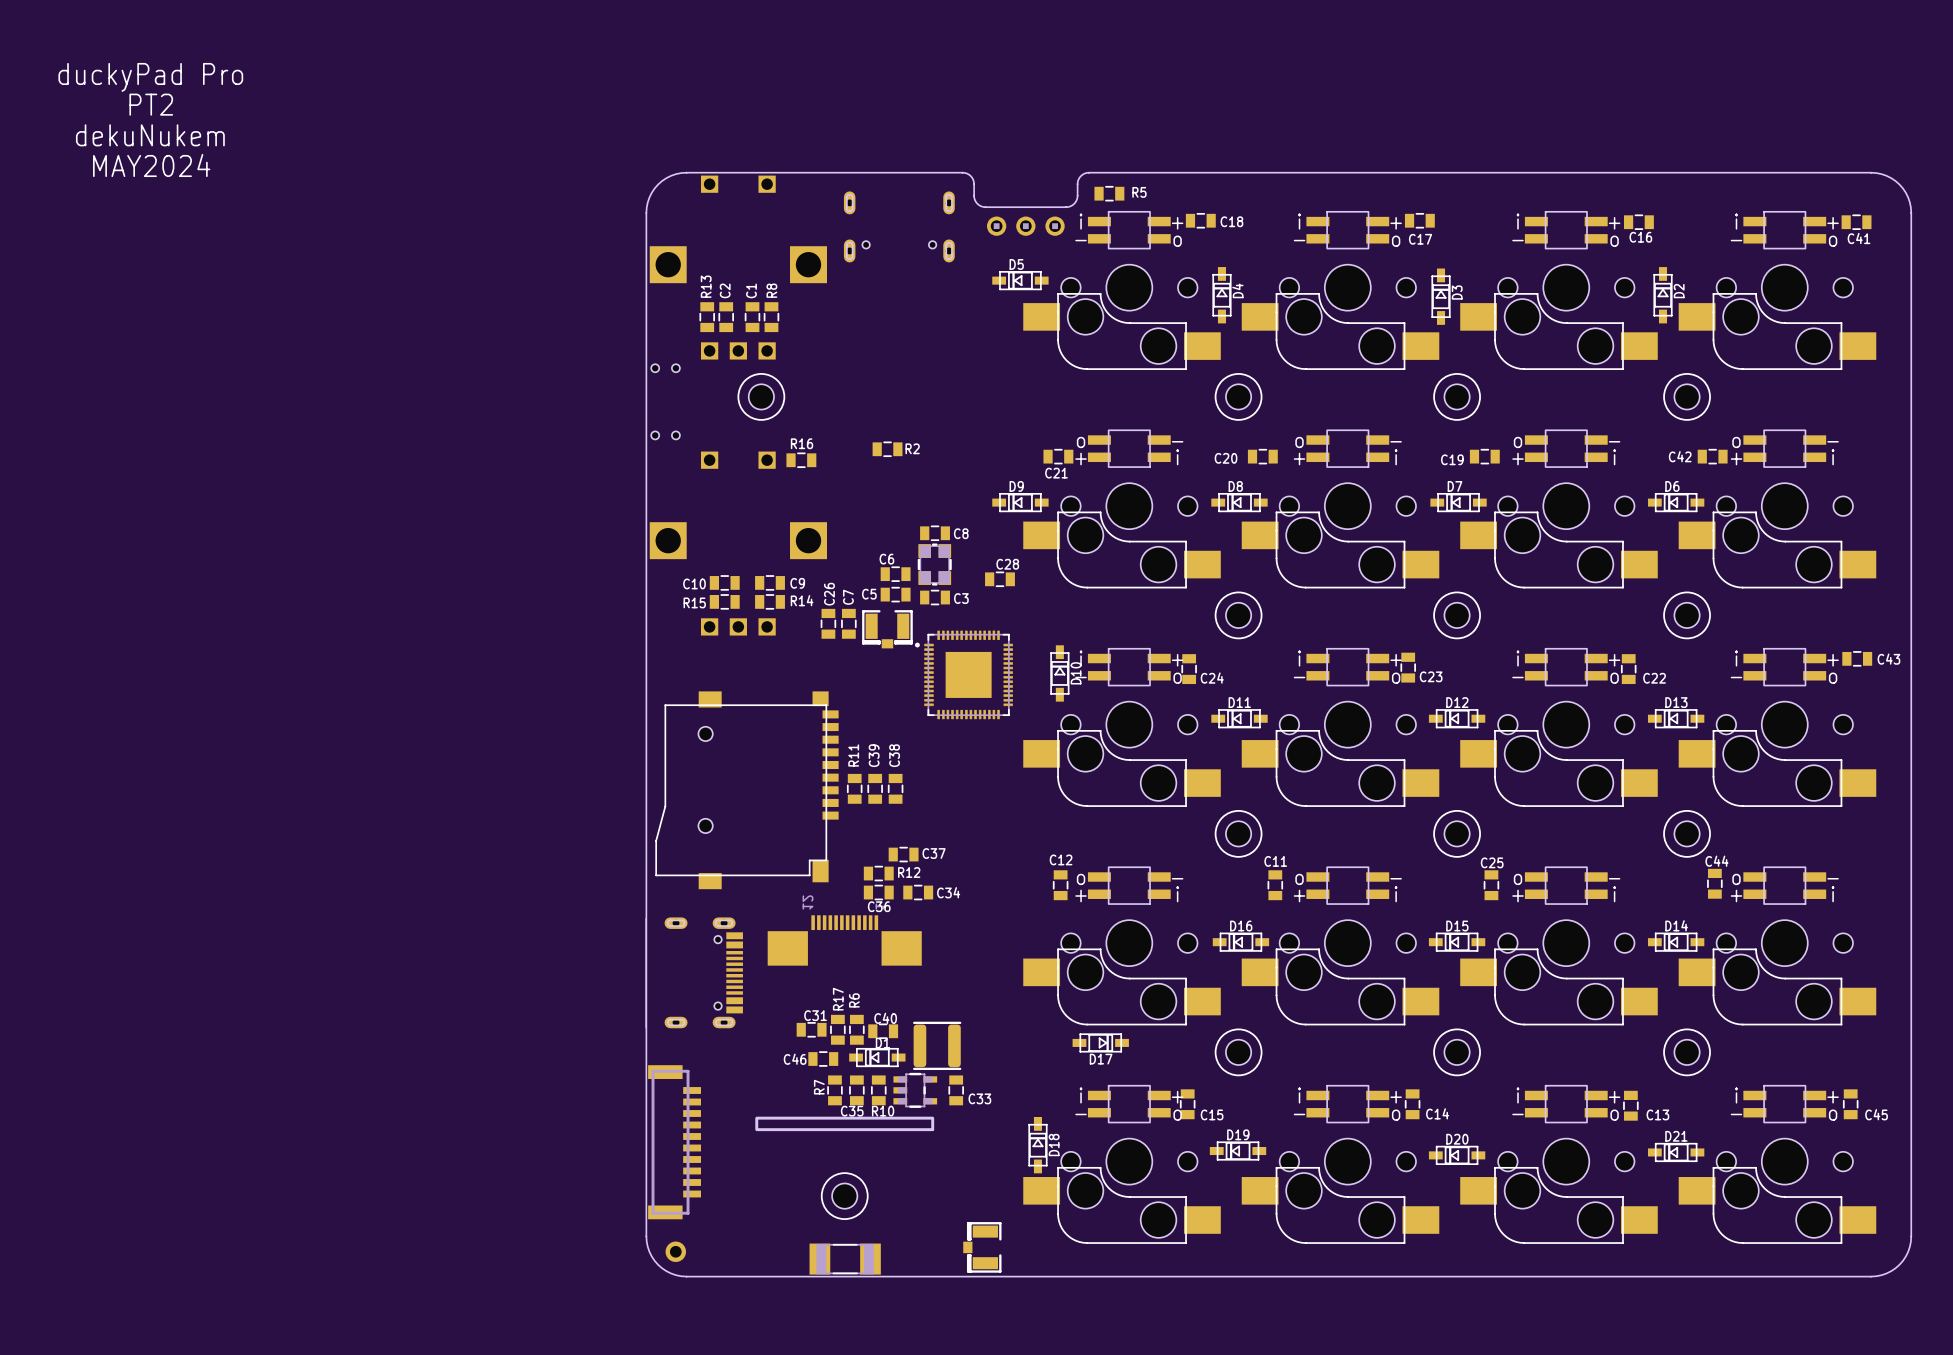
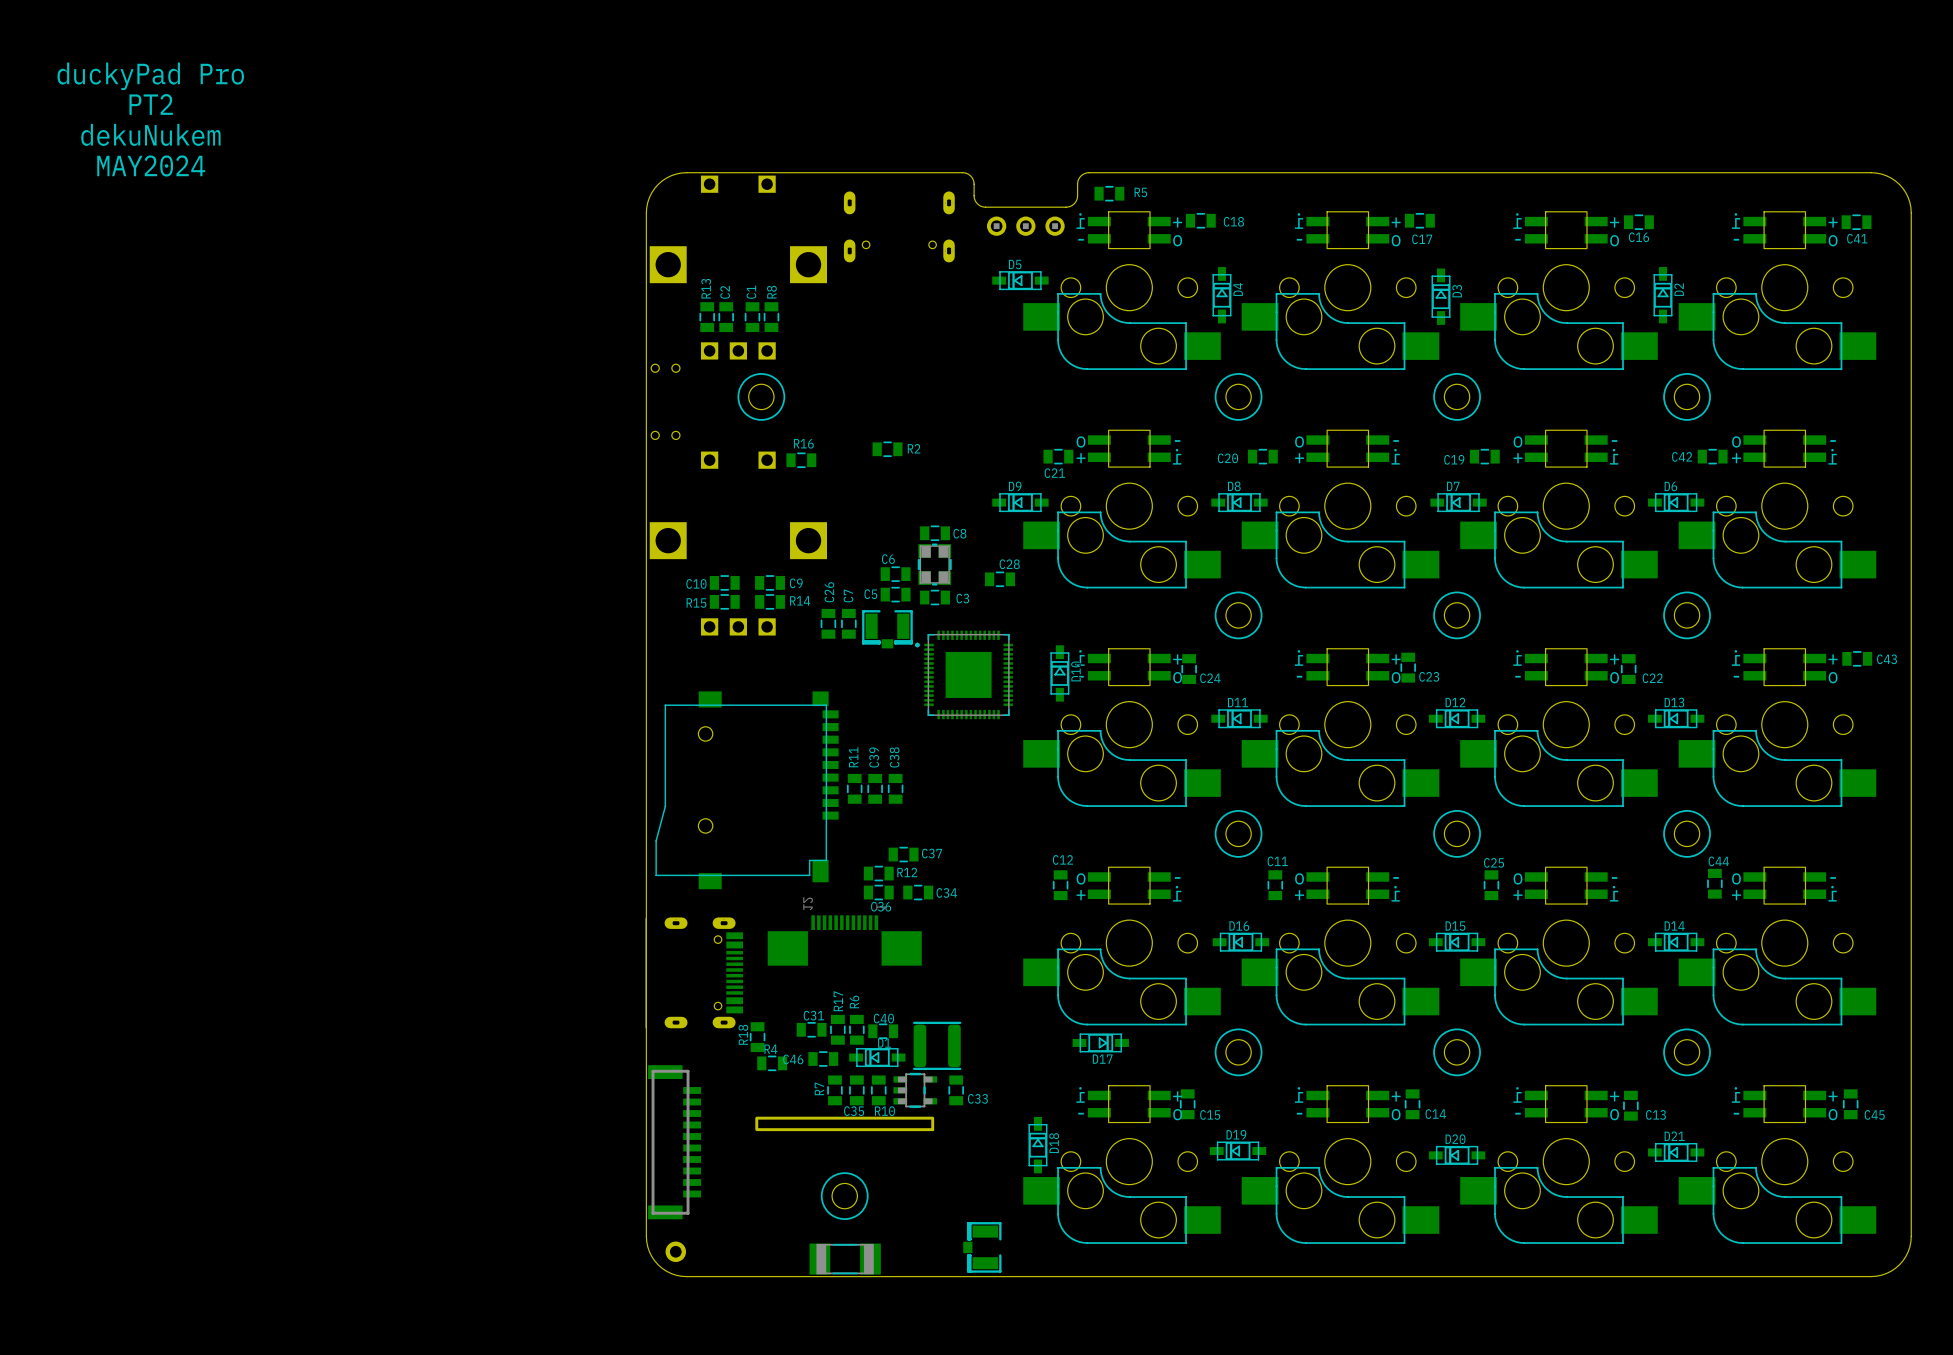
R18: none -> (757, 1037)
R4: none -> (772, 1063)

